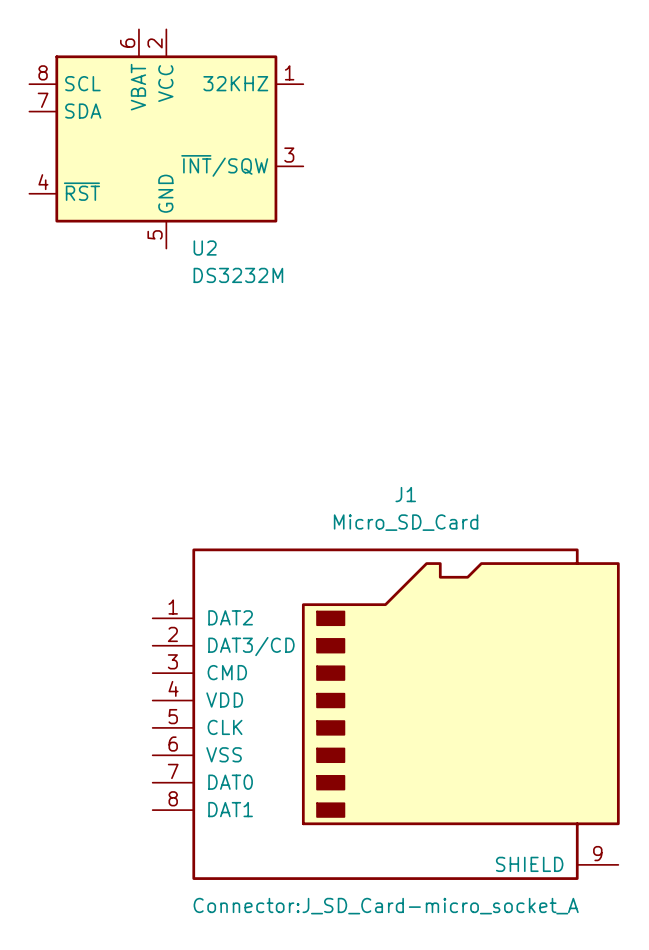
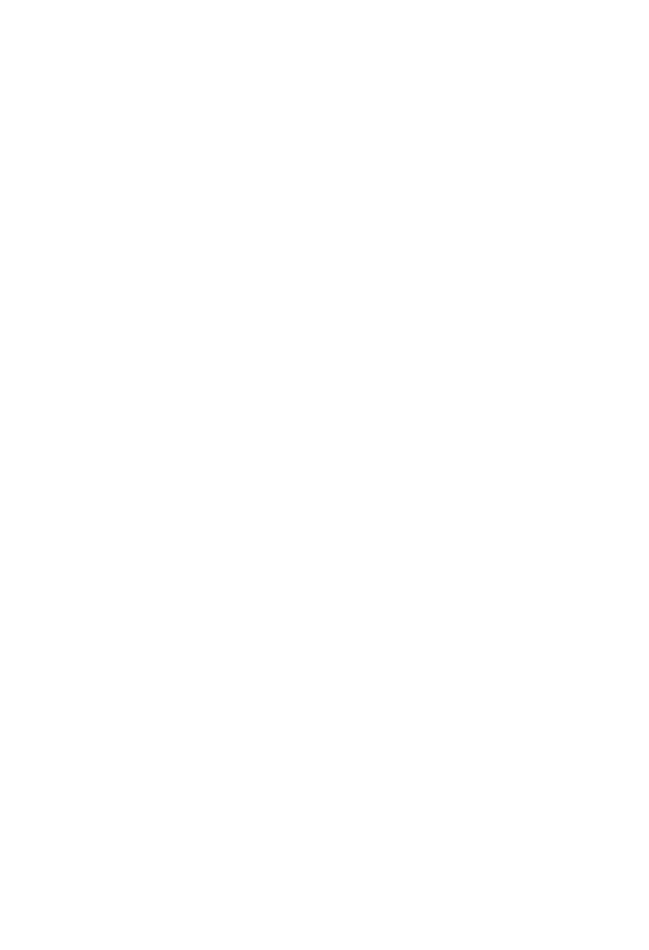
U2: DS3232M (166, 138) -> none
J1: Micro_SD_Card (386, 714) -> none

